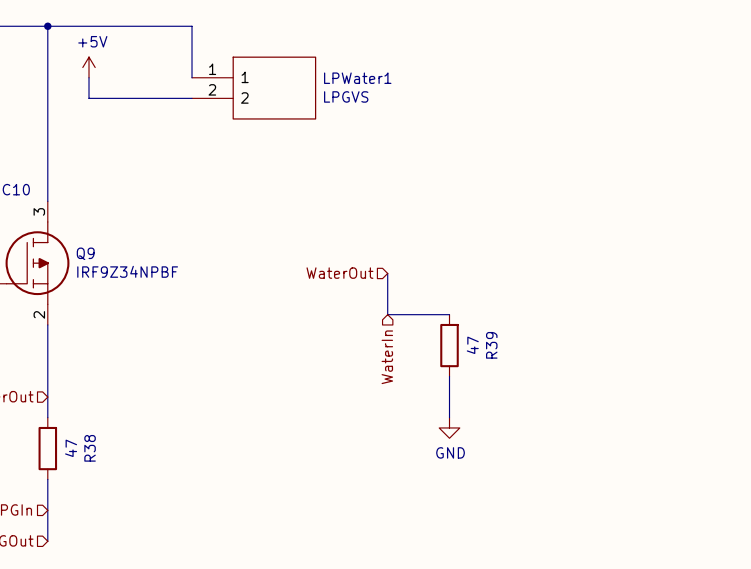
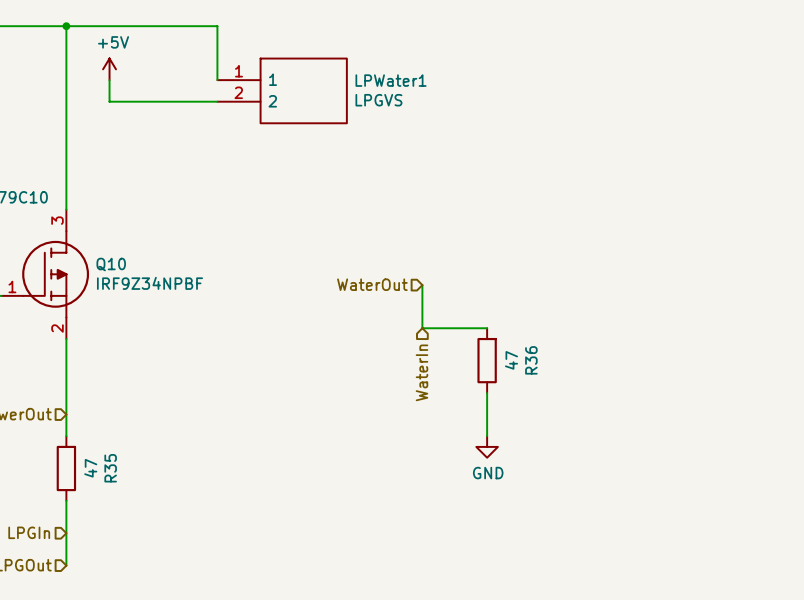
Q9 name: Q9 (85, 253) -> Q10 (111, 264)
R39 name: R39 (491, 345) -> R36 (531, 360)
R38 name: R38 (90, 448) -> R35 (110, 468)

